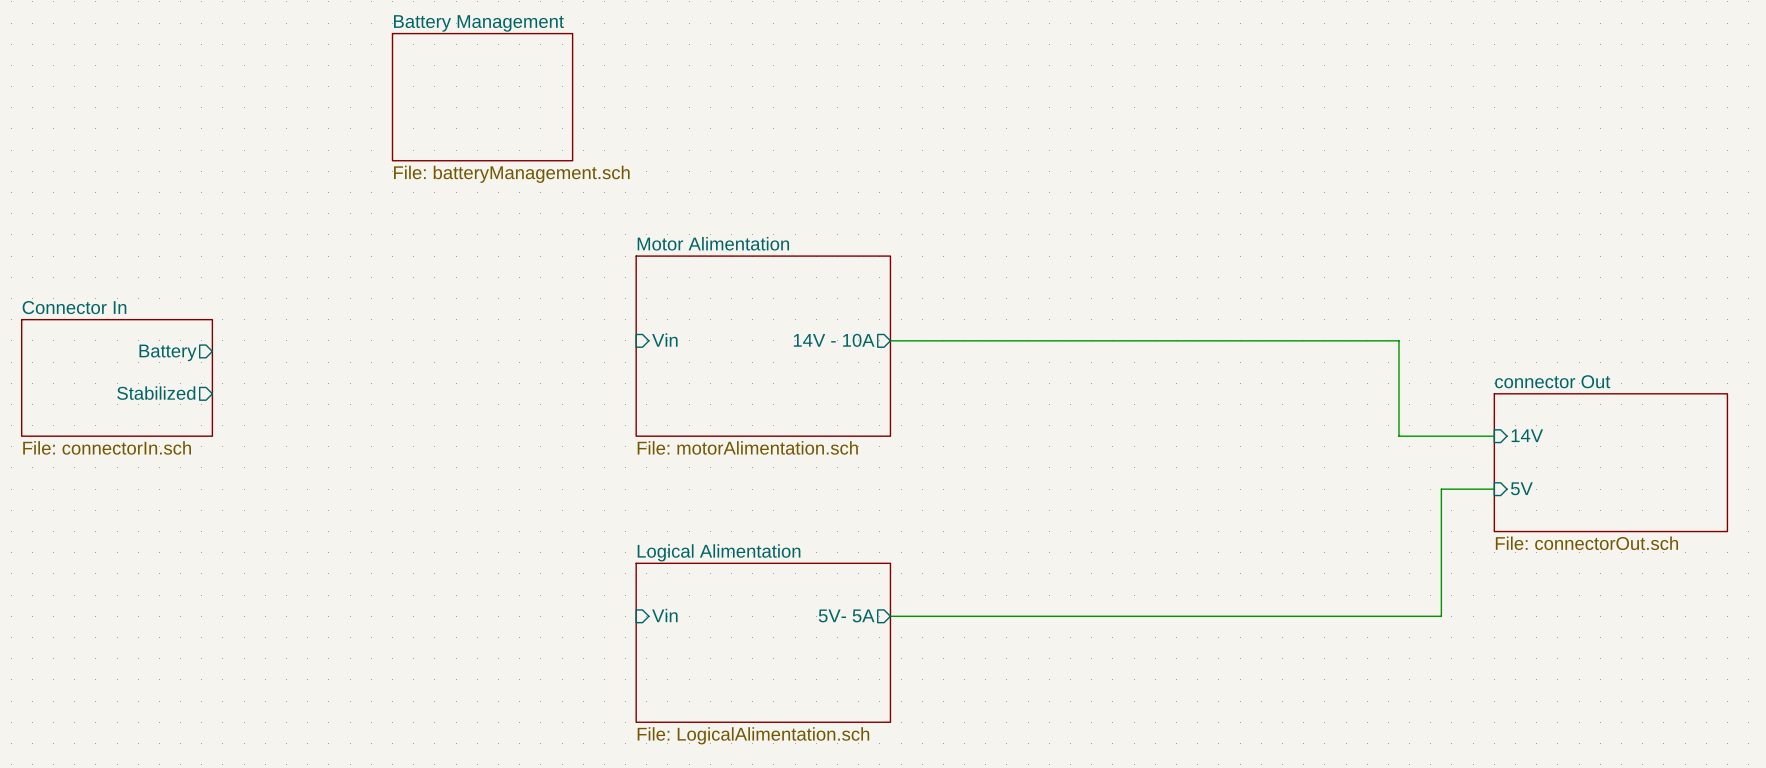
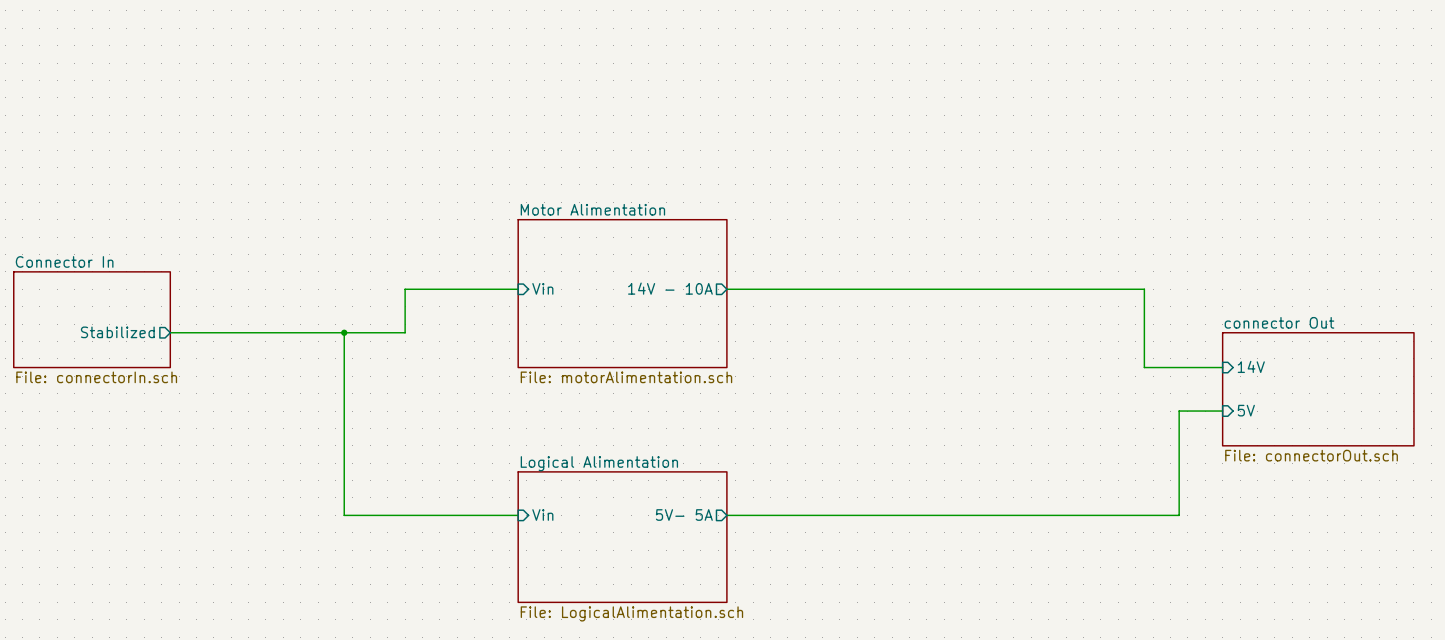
sheet Battery Management: File: batteryManagement.sch (482, 97) -> none
wire: none -> (518, 289) (405, 289) (405, 332) (170, 332)
sheet pin: Battery (167, 352) -> none
wire: none -> (344, 332) (344, 515) (518, 515)
junction: none -> (344, 332)

